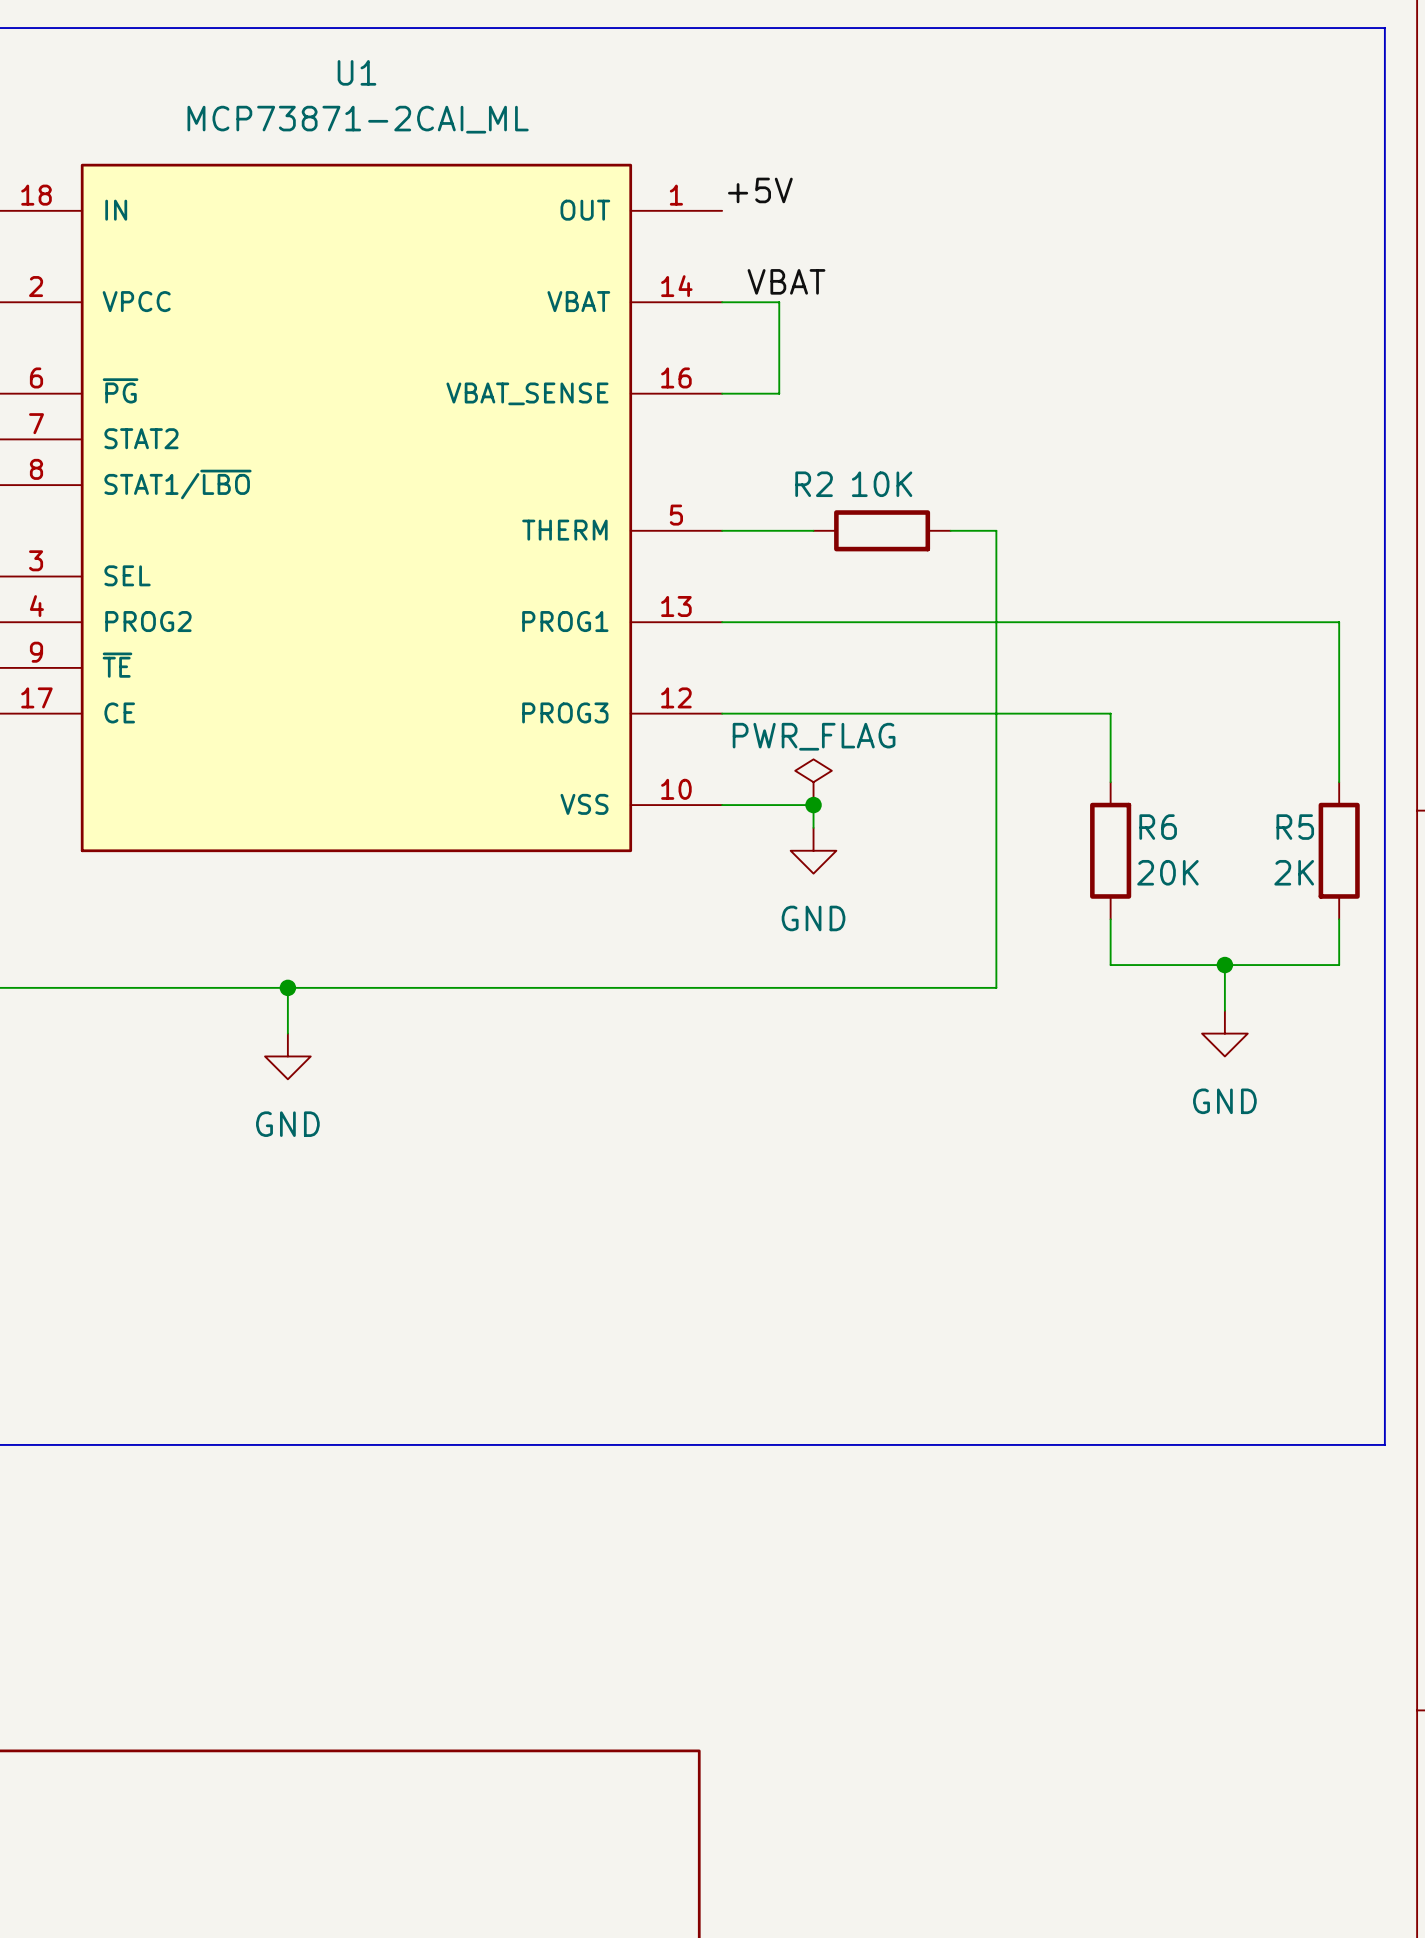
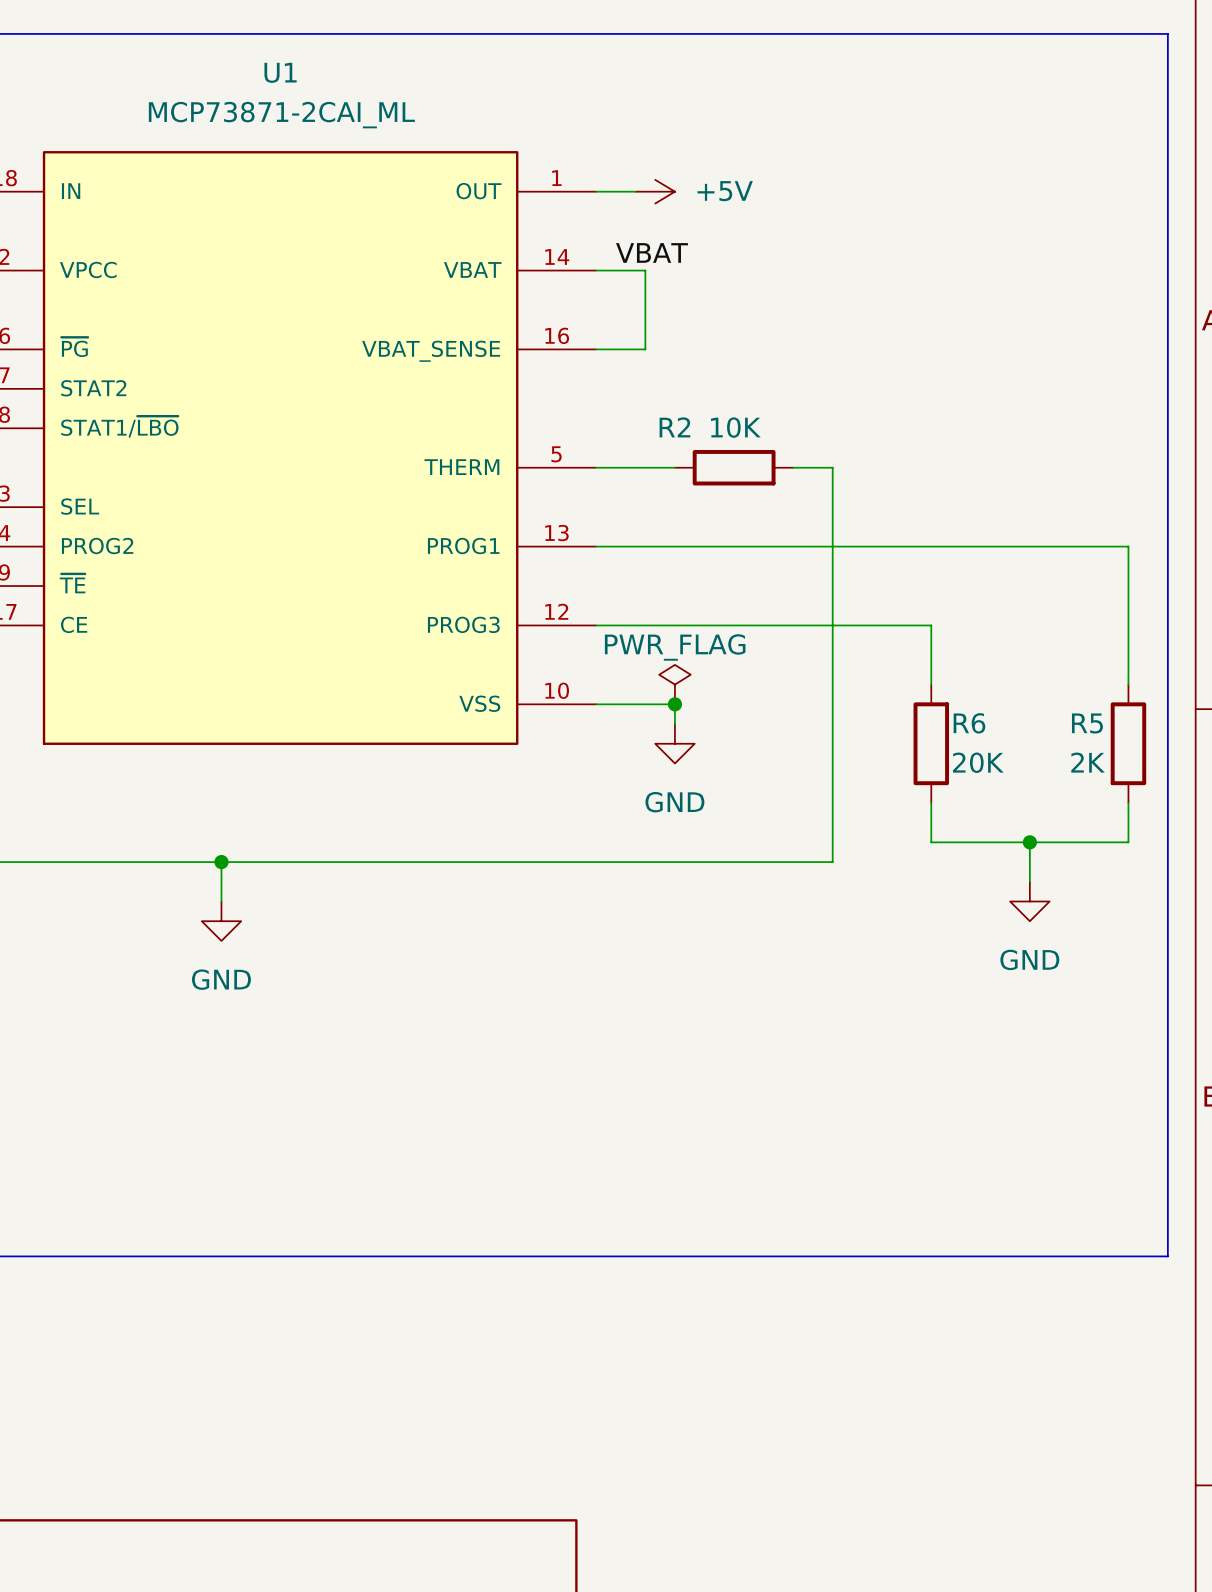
label: +5V (760, 190) -> none
wire: none -> (596, 191) (635, 191)
power symbol: none -> +5V (655, 191)

